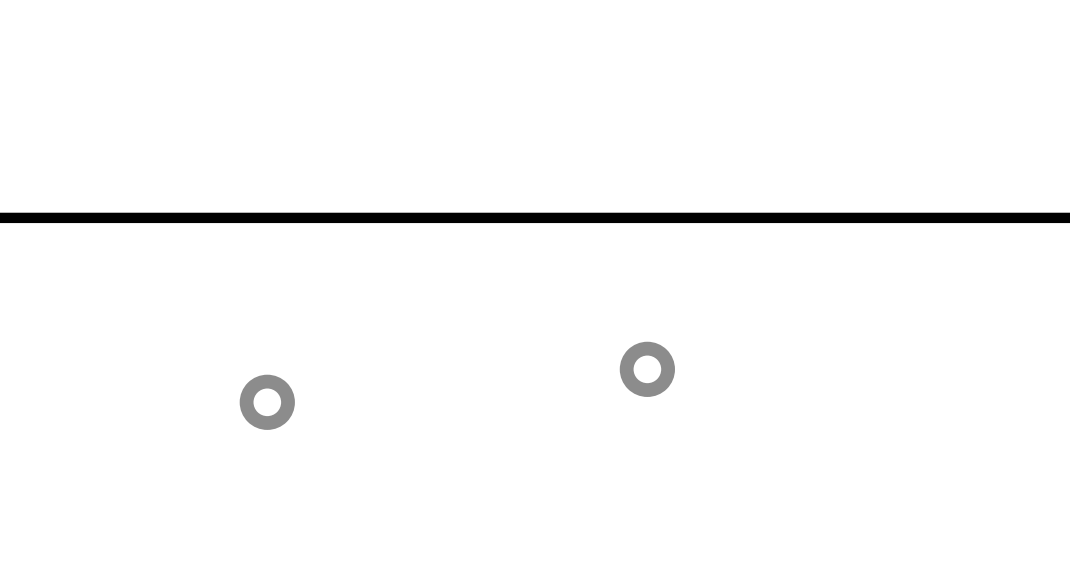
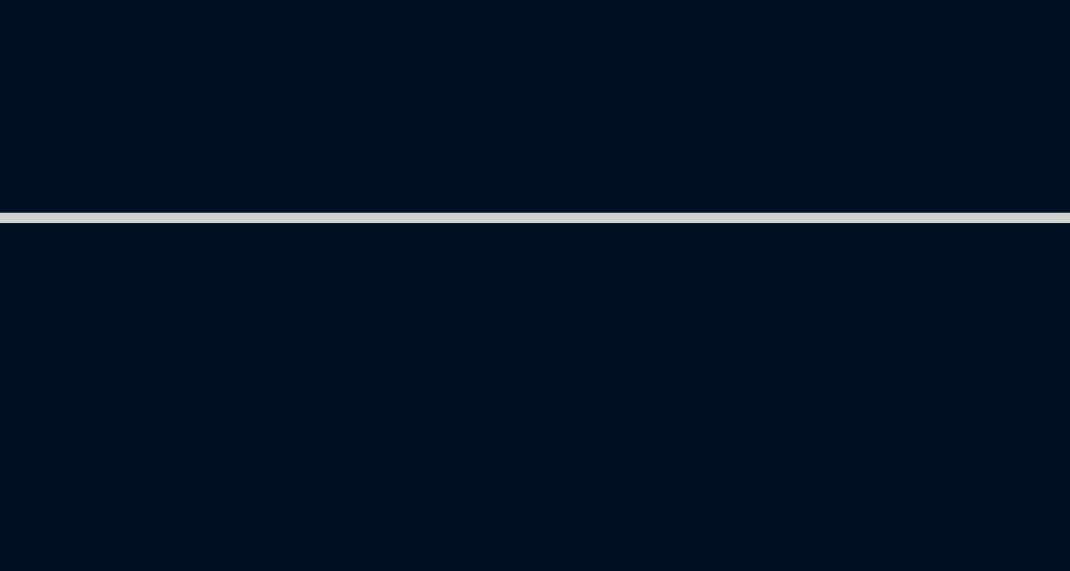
via: (647, 369) -> none
via: (267, 402) -> none

